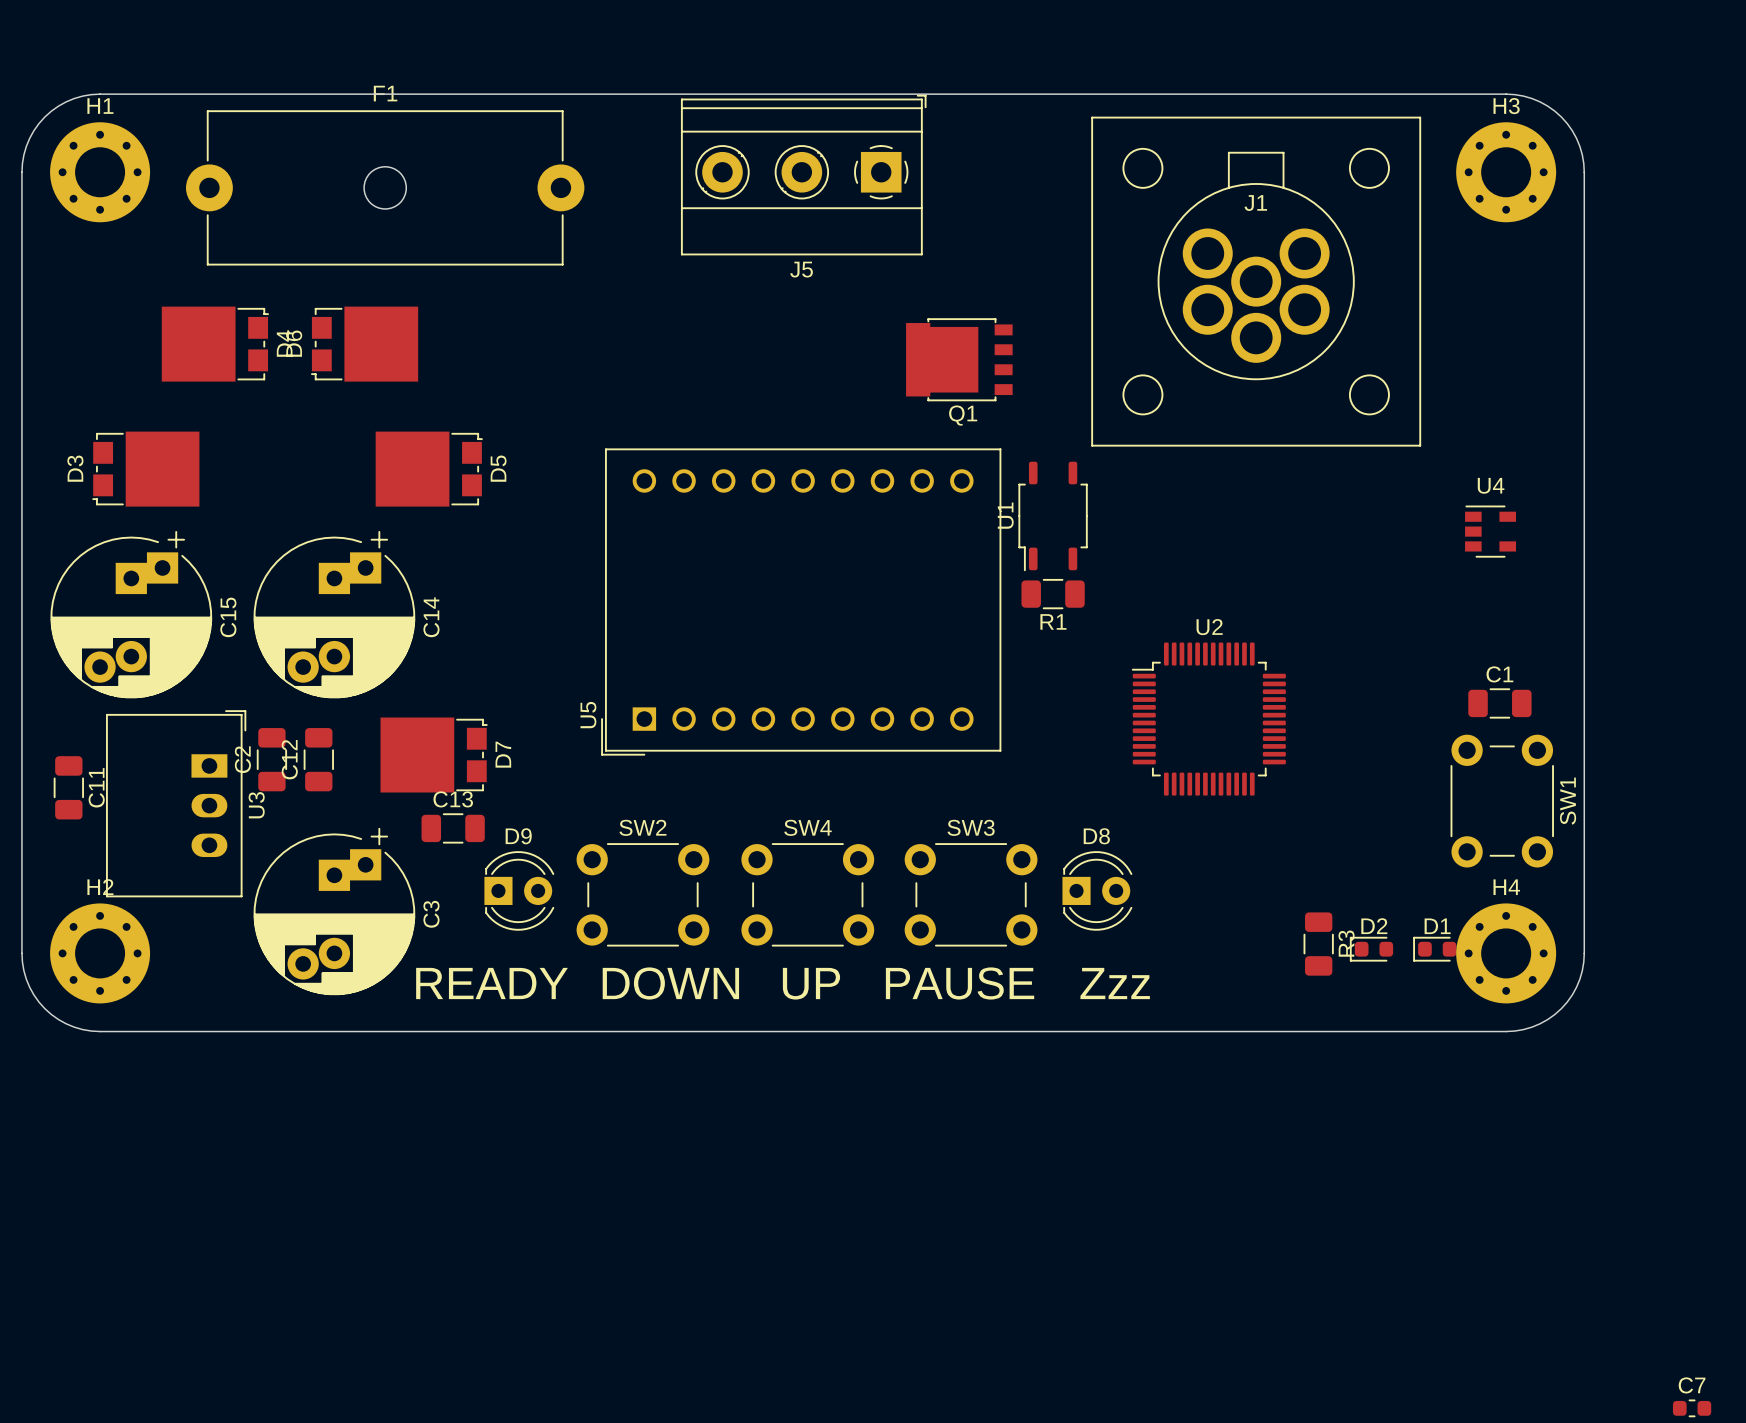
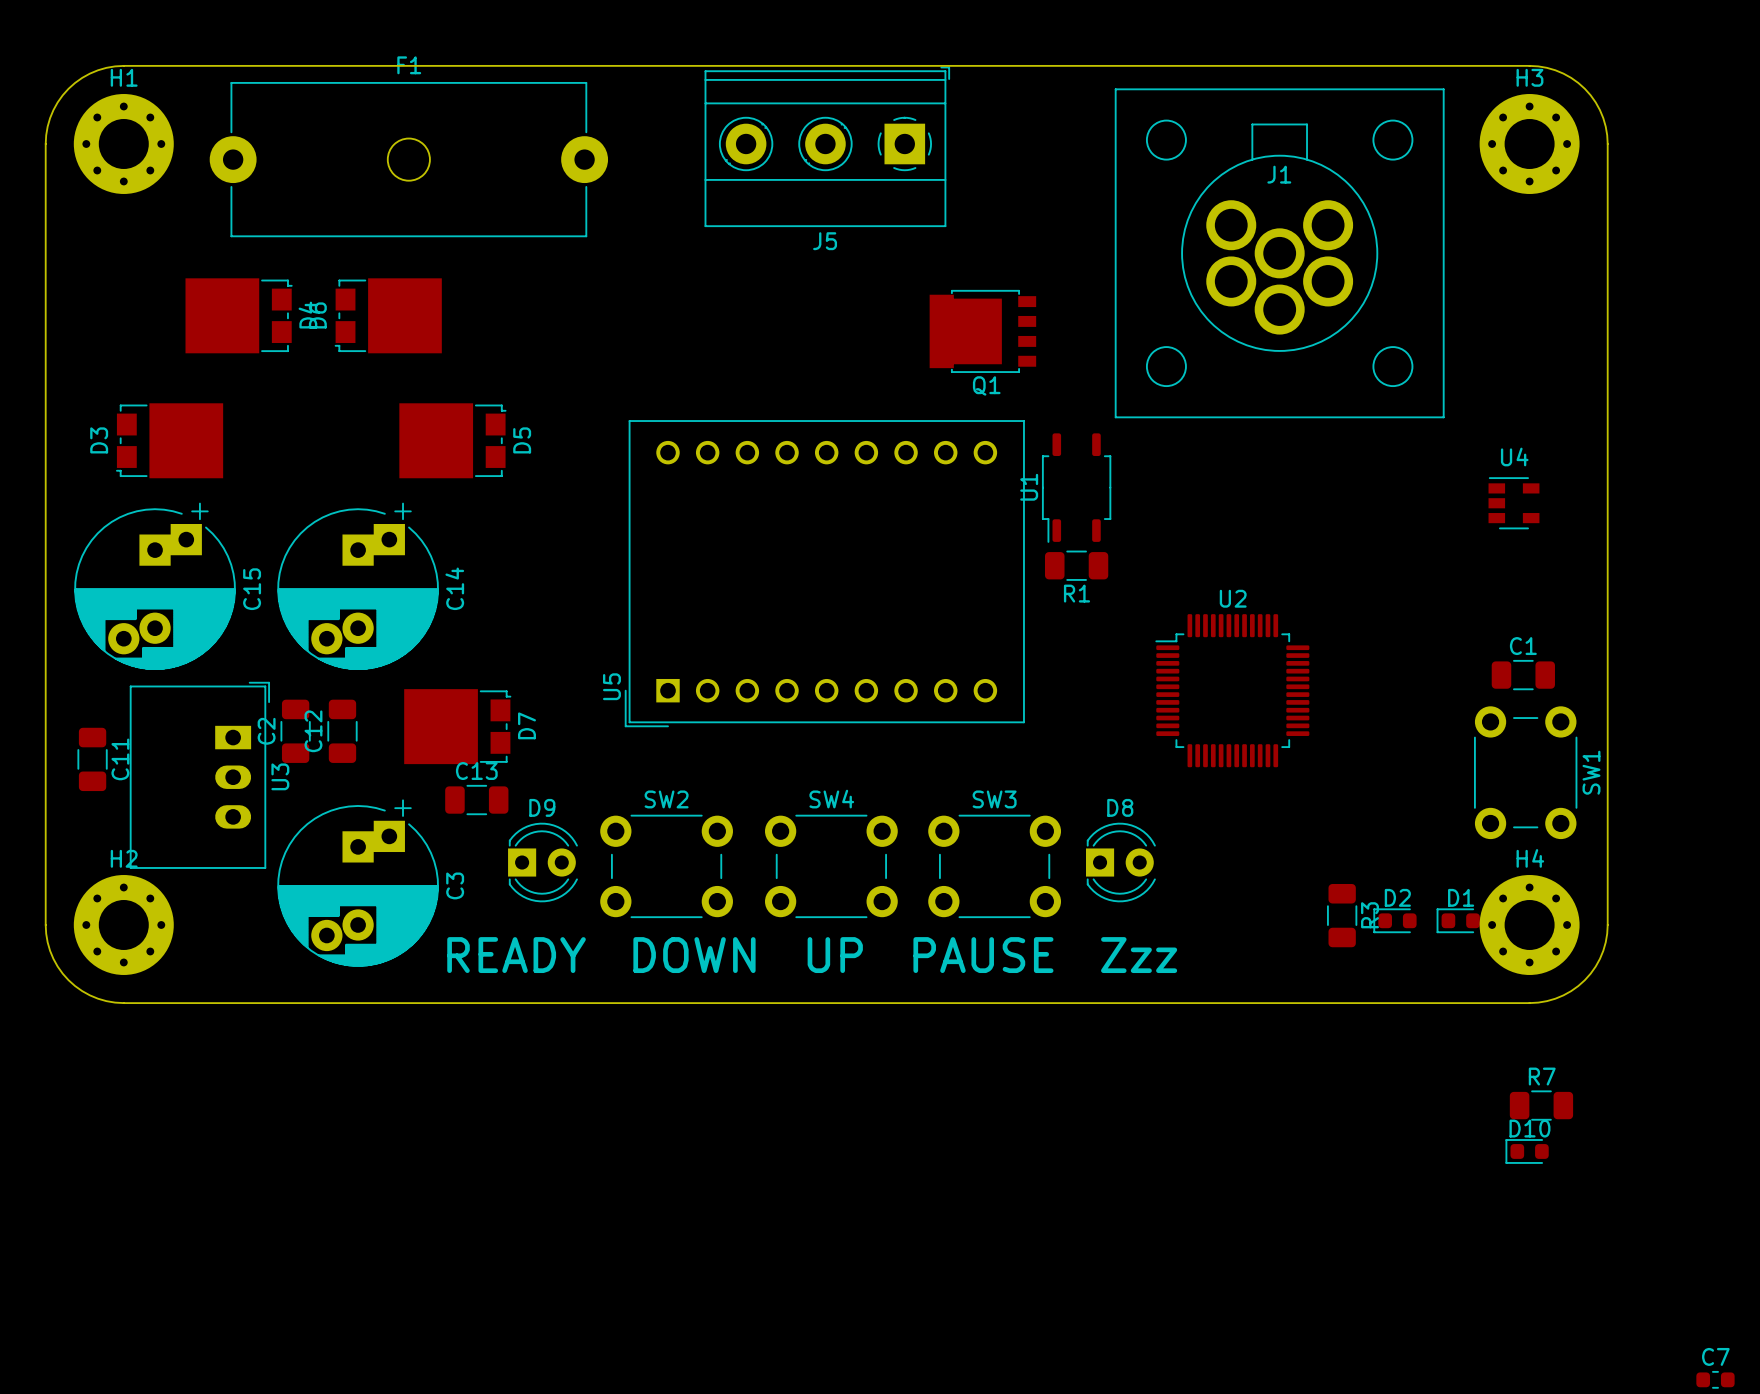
R7: none -> (1541, 1105)
D10: none -> (1527, 1151)

